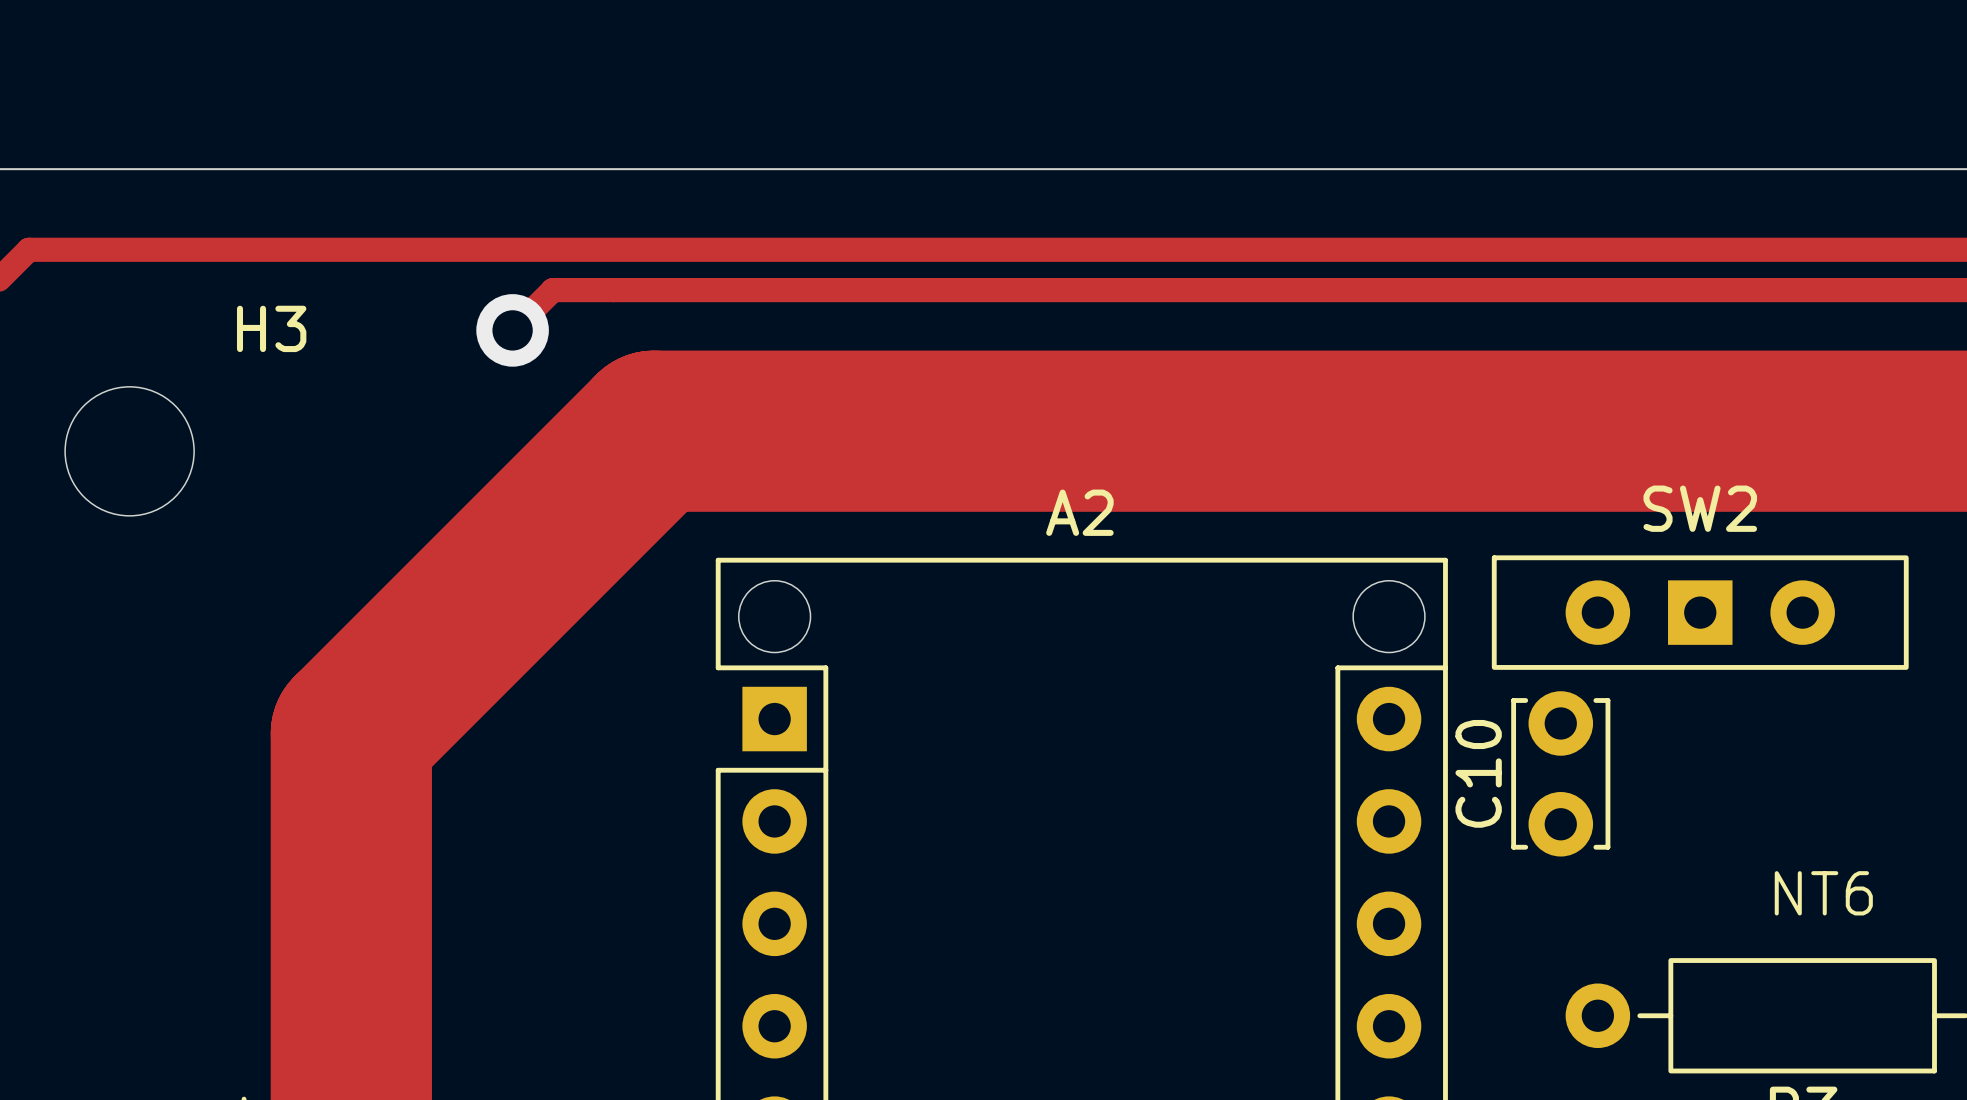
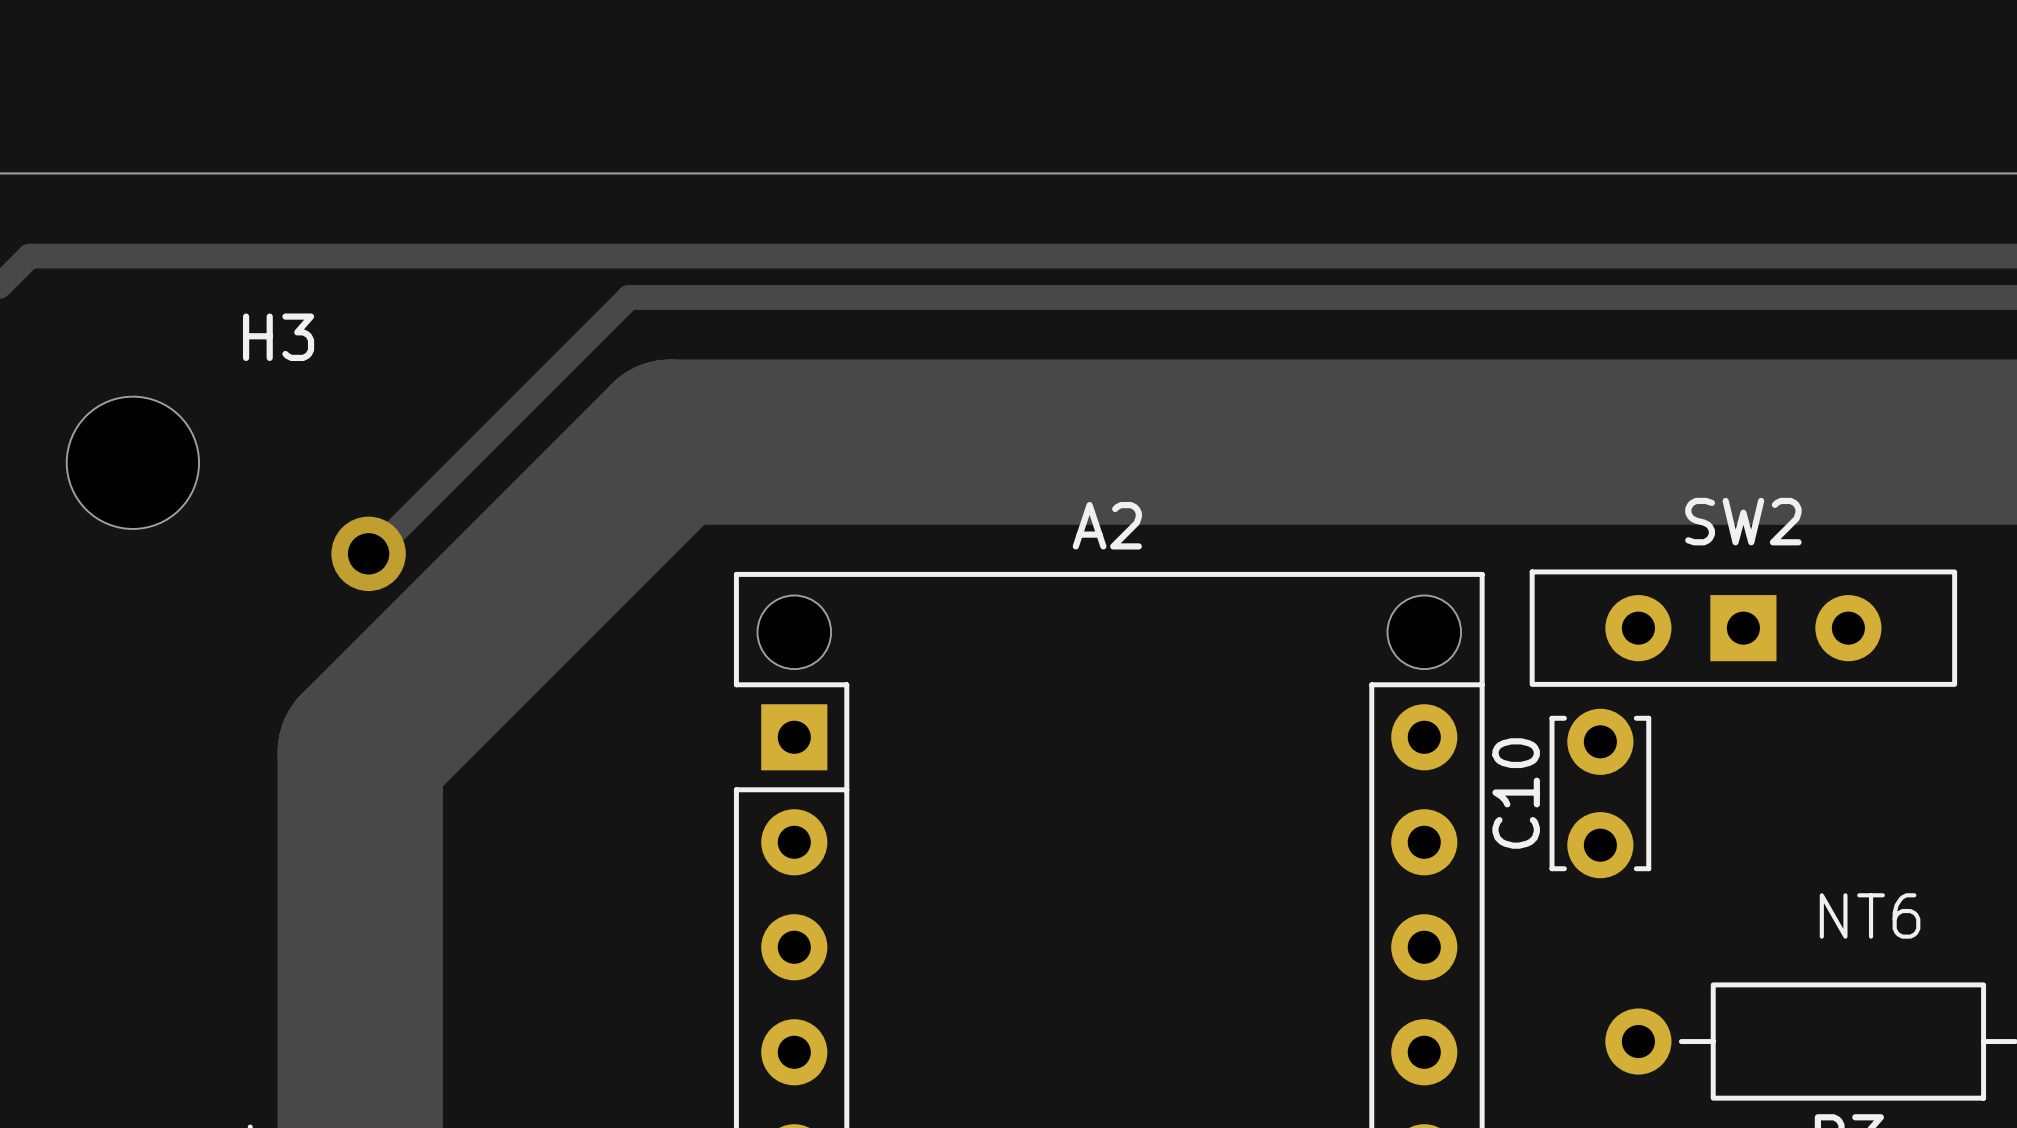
track: (613, 290) (552, 290) (512, 330) -> (628, 297) (372, 553) (368, 553)
via: (512, 330) -> none
via: none -> (368, 553)

